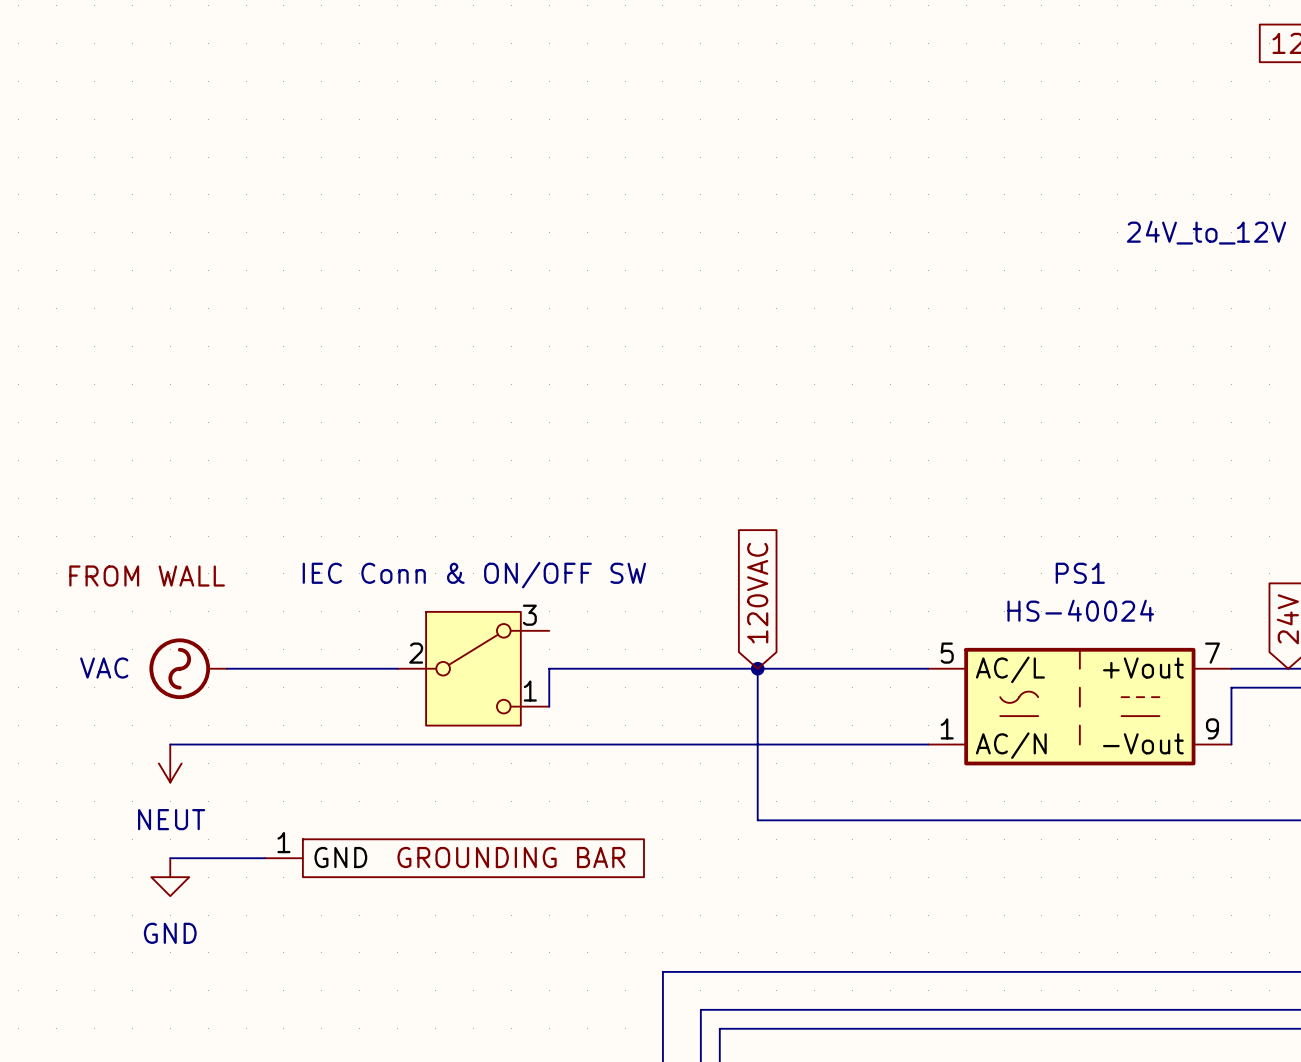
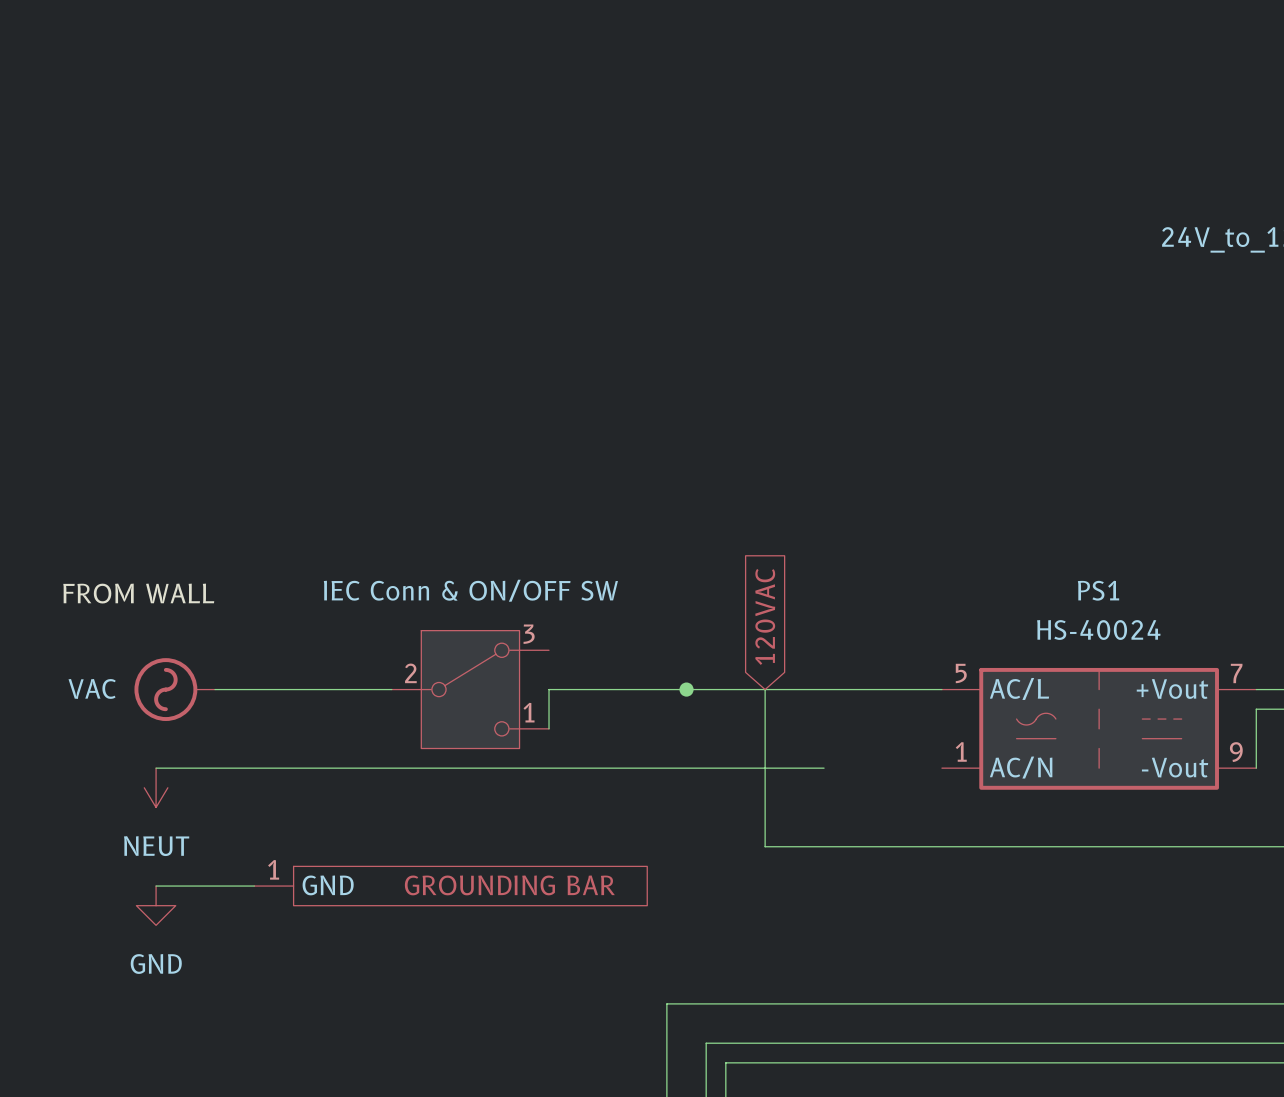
junction position: (757, 668) -> (686, 689)
wire: (814, 744) (928, 744) -> none

